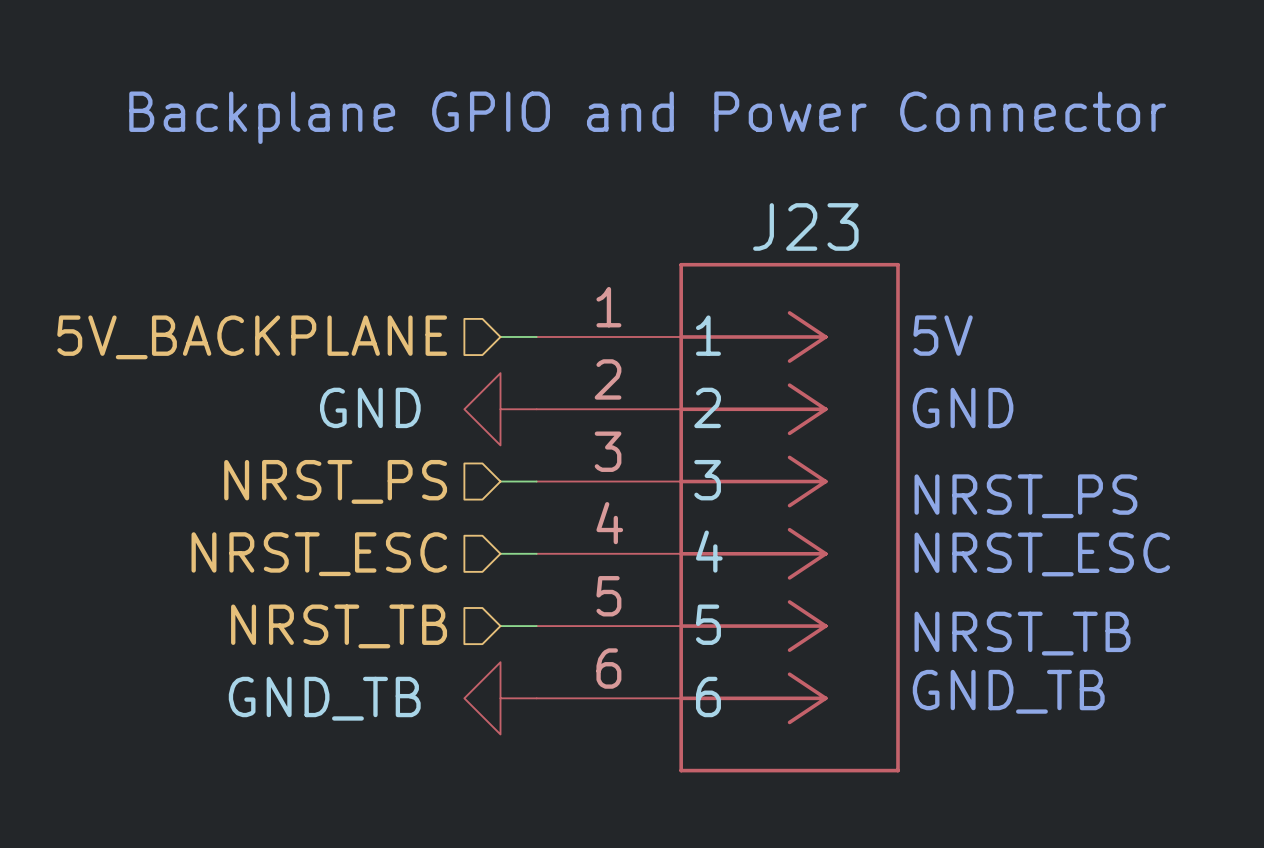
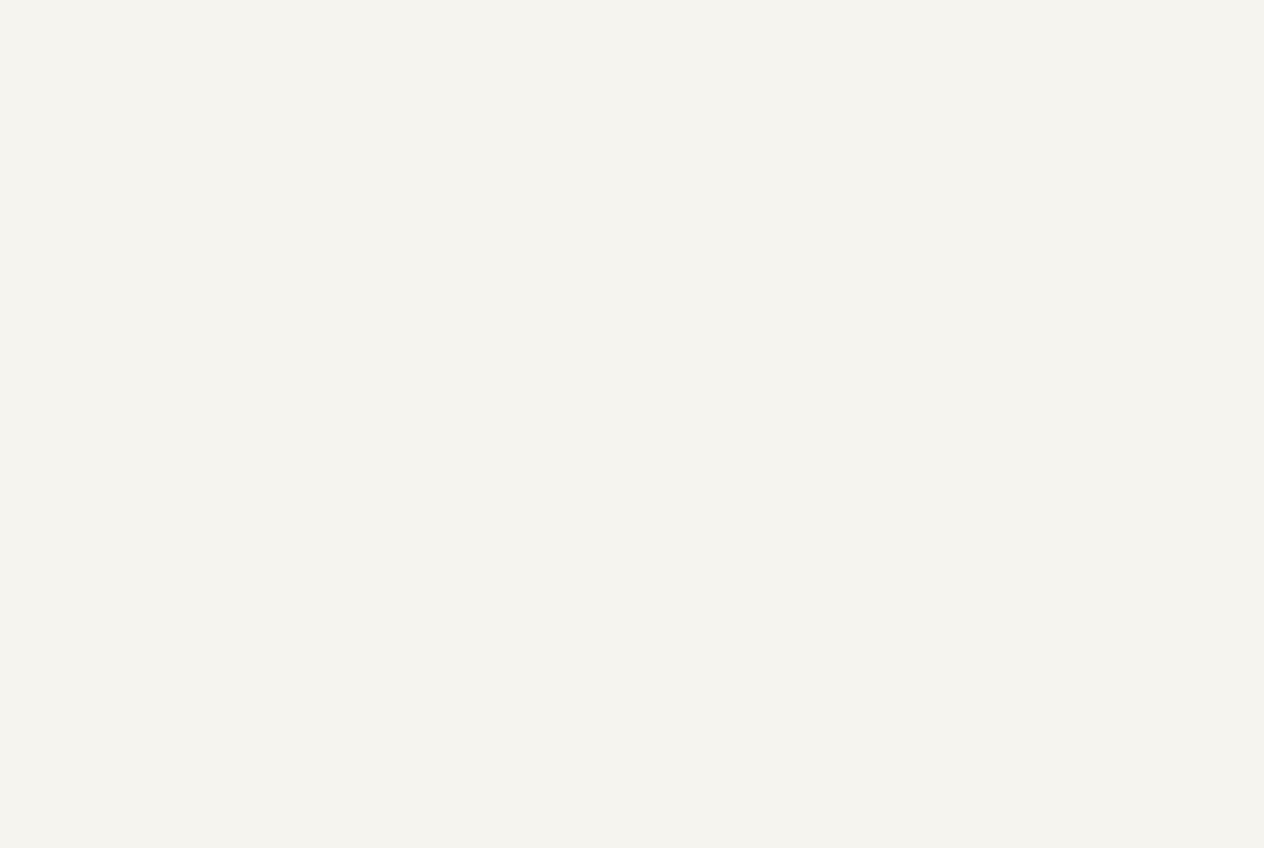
text: Backplane GPIO and Power Connector (647, 117) -> none
text: 5V (943, 335) -> none
wire: (500, 336) (536, 336) -> none
hierarchical label: 5V_BACKPLANE (252, 337) -> none
text: GND (963, 408) -> none
power symbol: GND (500, 409) -> none
hierarchical label: NRST_PS (335, 481) -> none
wire: (500, 481) (536, 481) -> none
text: NRST_PS (1025, 496) -> none
J23: (718, 517) -> none
wire: (500, 553) (536, 553) -> none
hierarchical label: NRST_ESC (319, 554) -> none
text: NRST_ESC (1042, 554) -> none
hierarchical label: NRST_TB (339, 626) -> none
wire: (500, 626) (536, 626) -> none
text: NRST_TB (1022, 633) -> none
text: GND_TB (1008, 691) -> none
power symbol: GND_TB (500, 698) -> none

